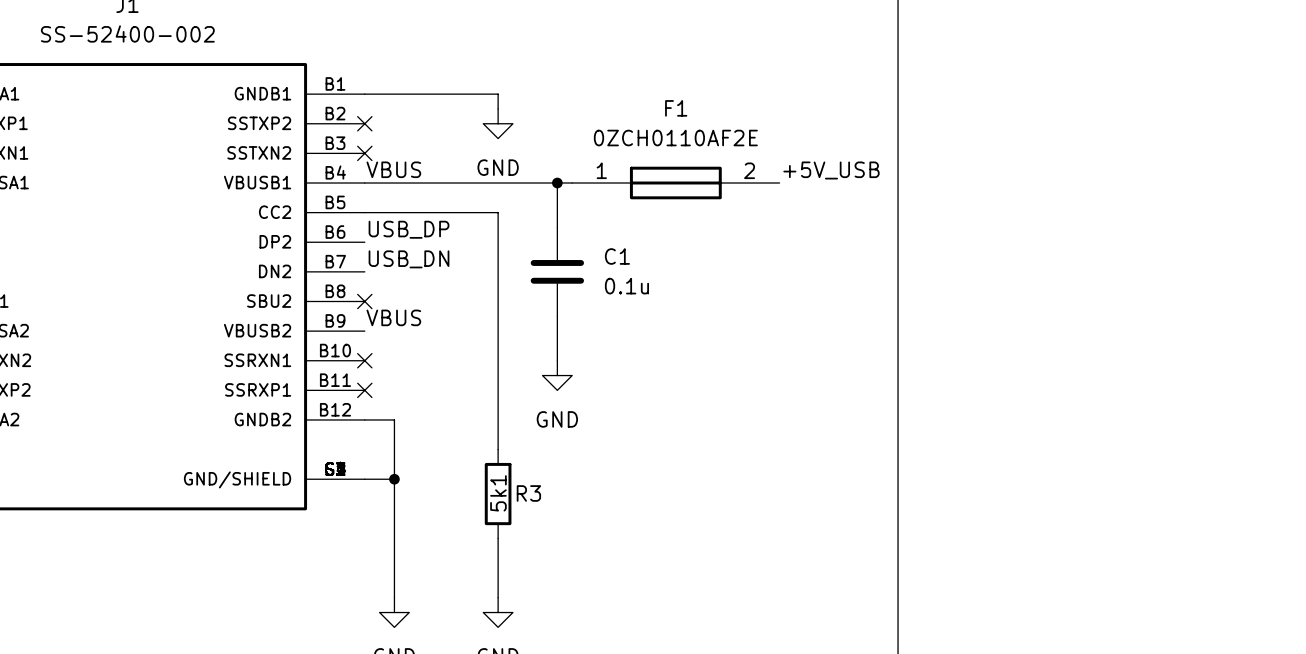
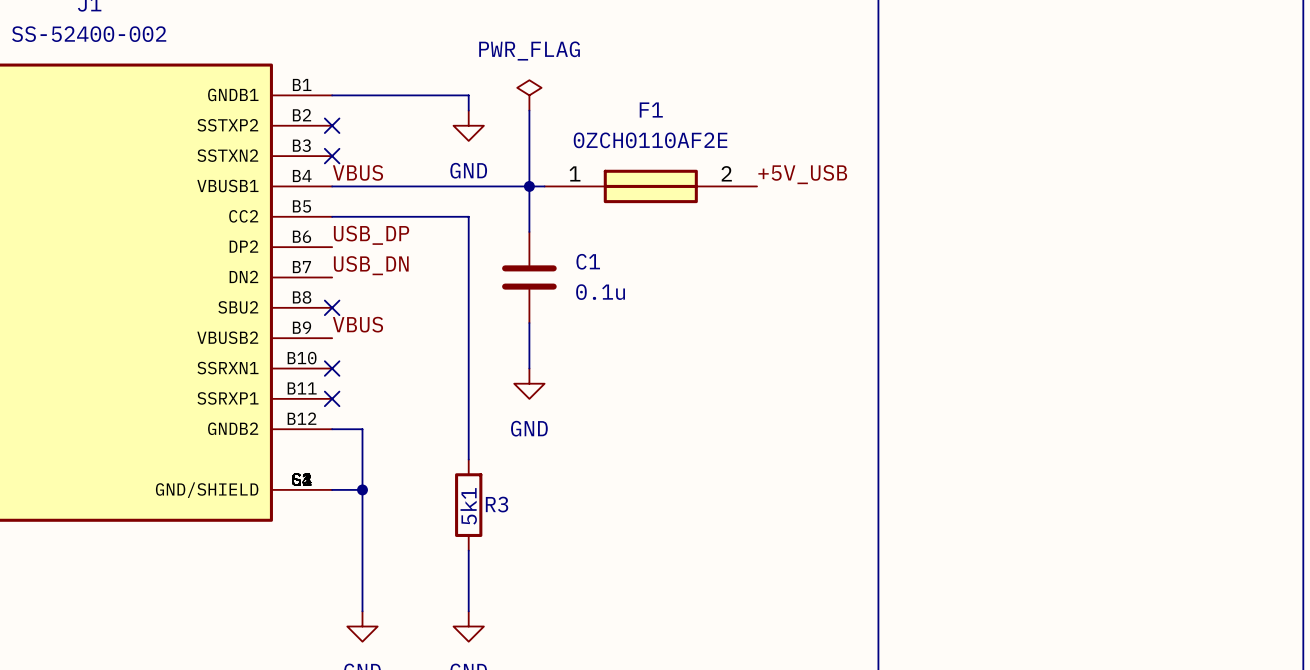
power symbol: none -> PWR_FLAG (529, 95)
wire: none -> (529, 110) (529, 186)

